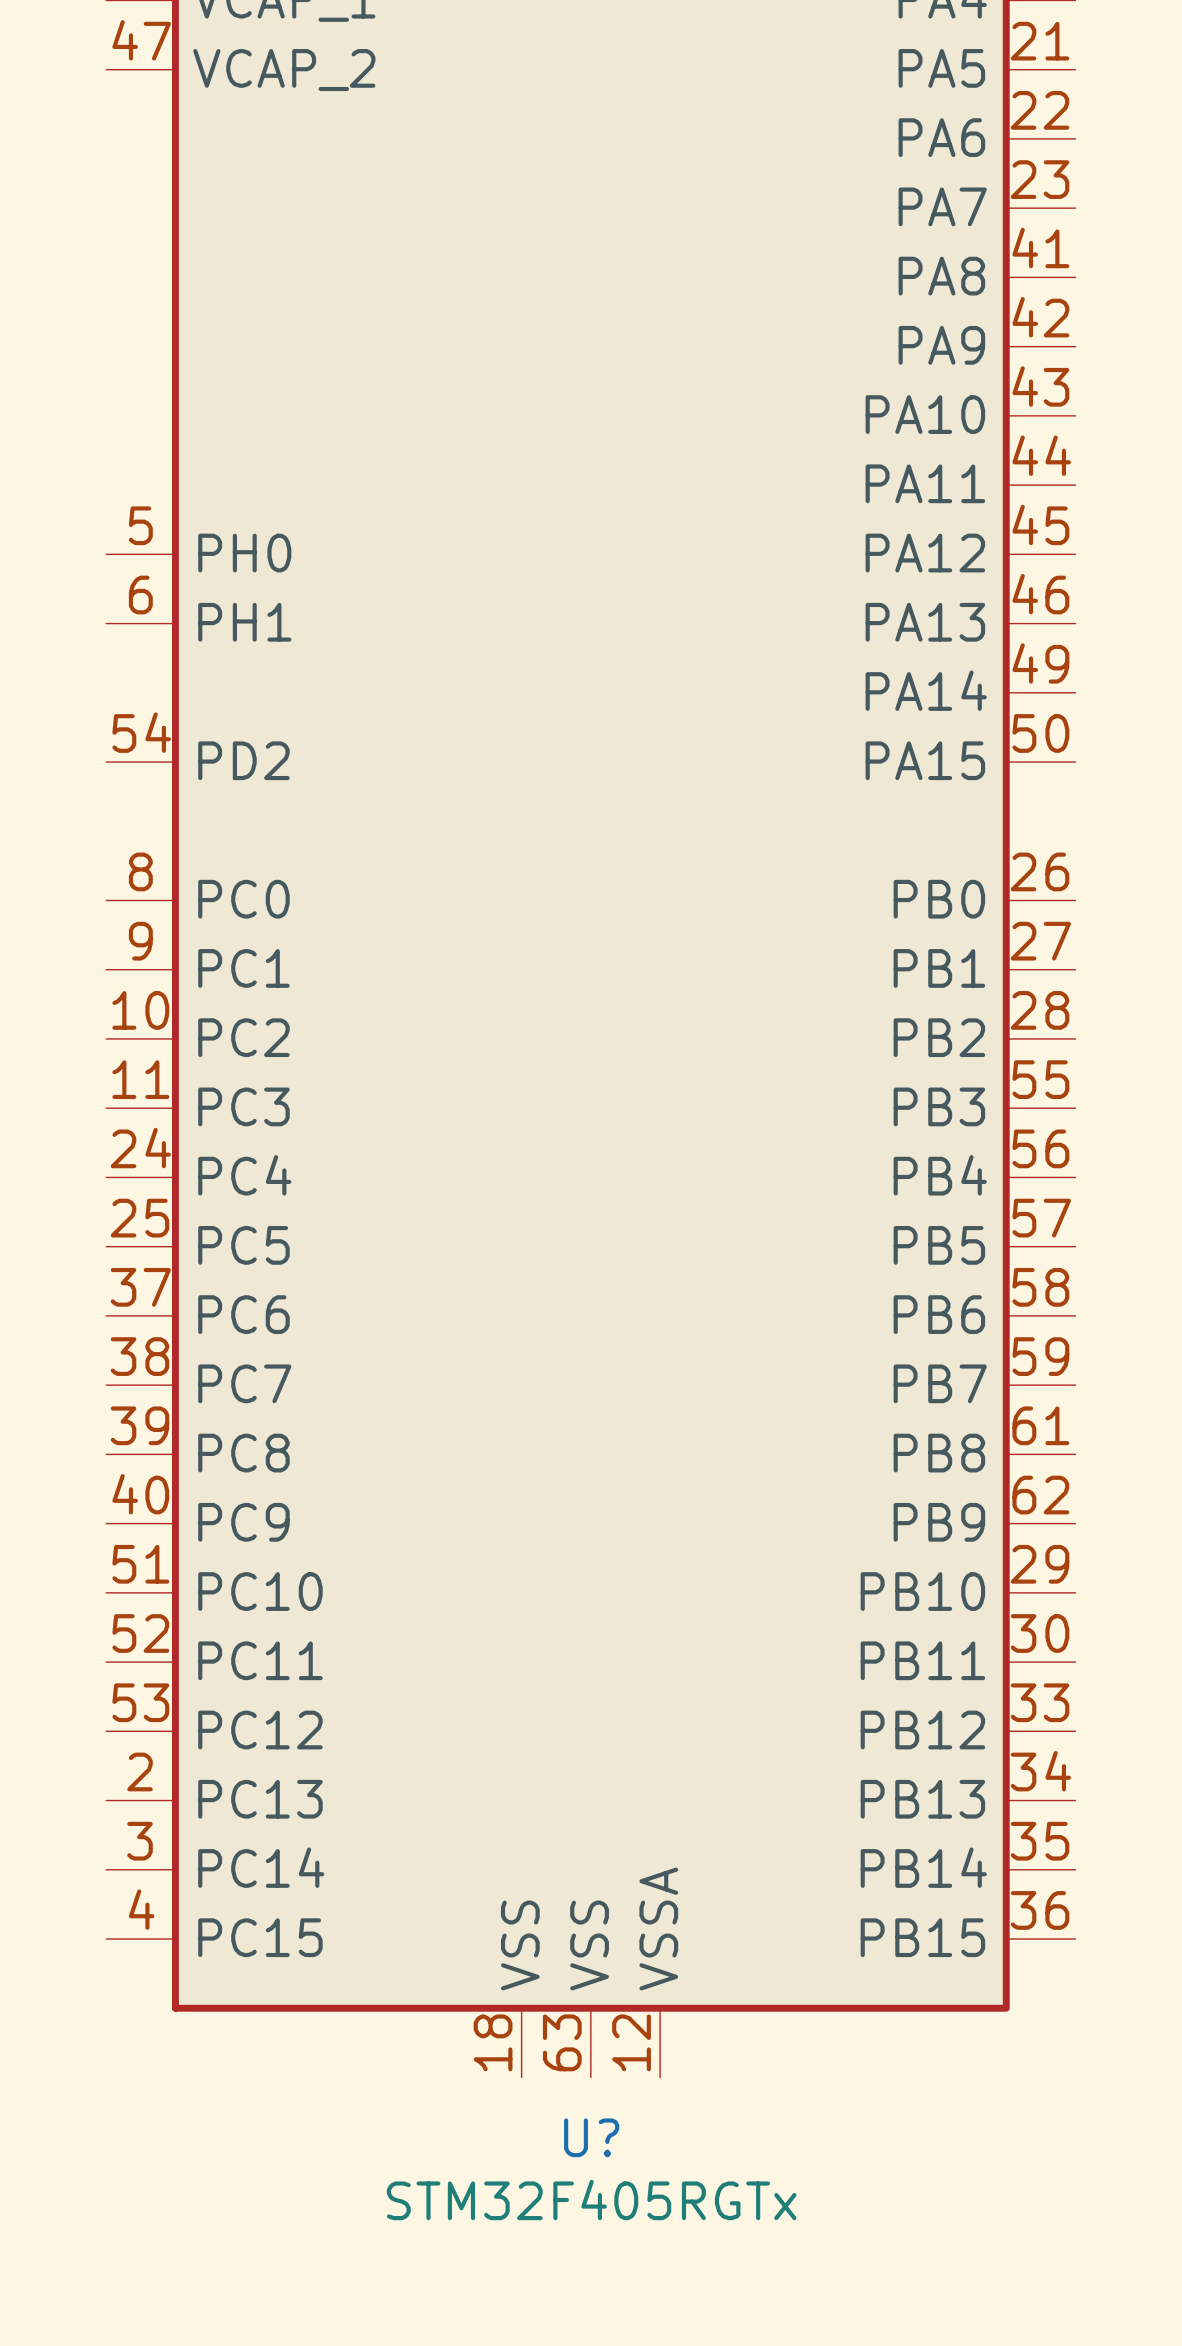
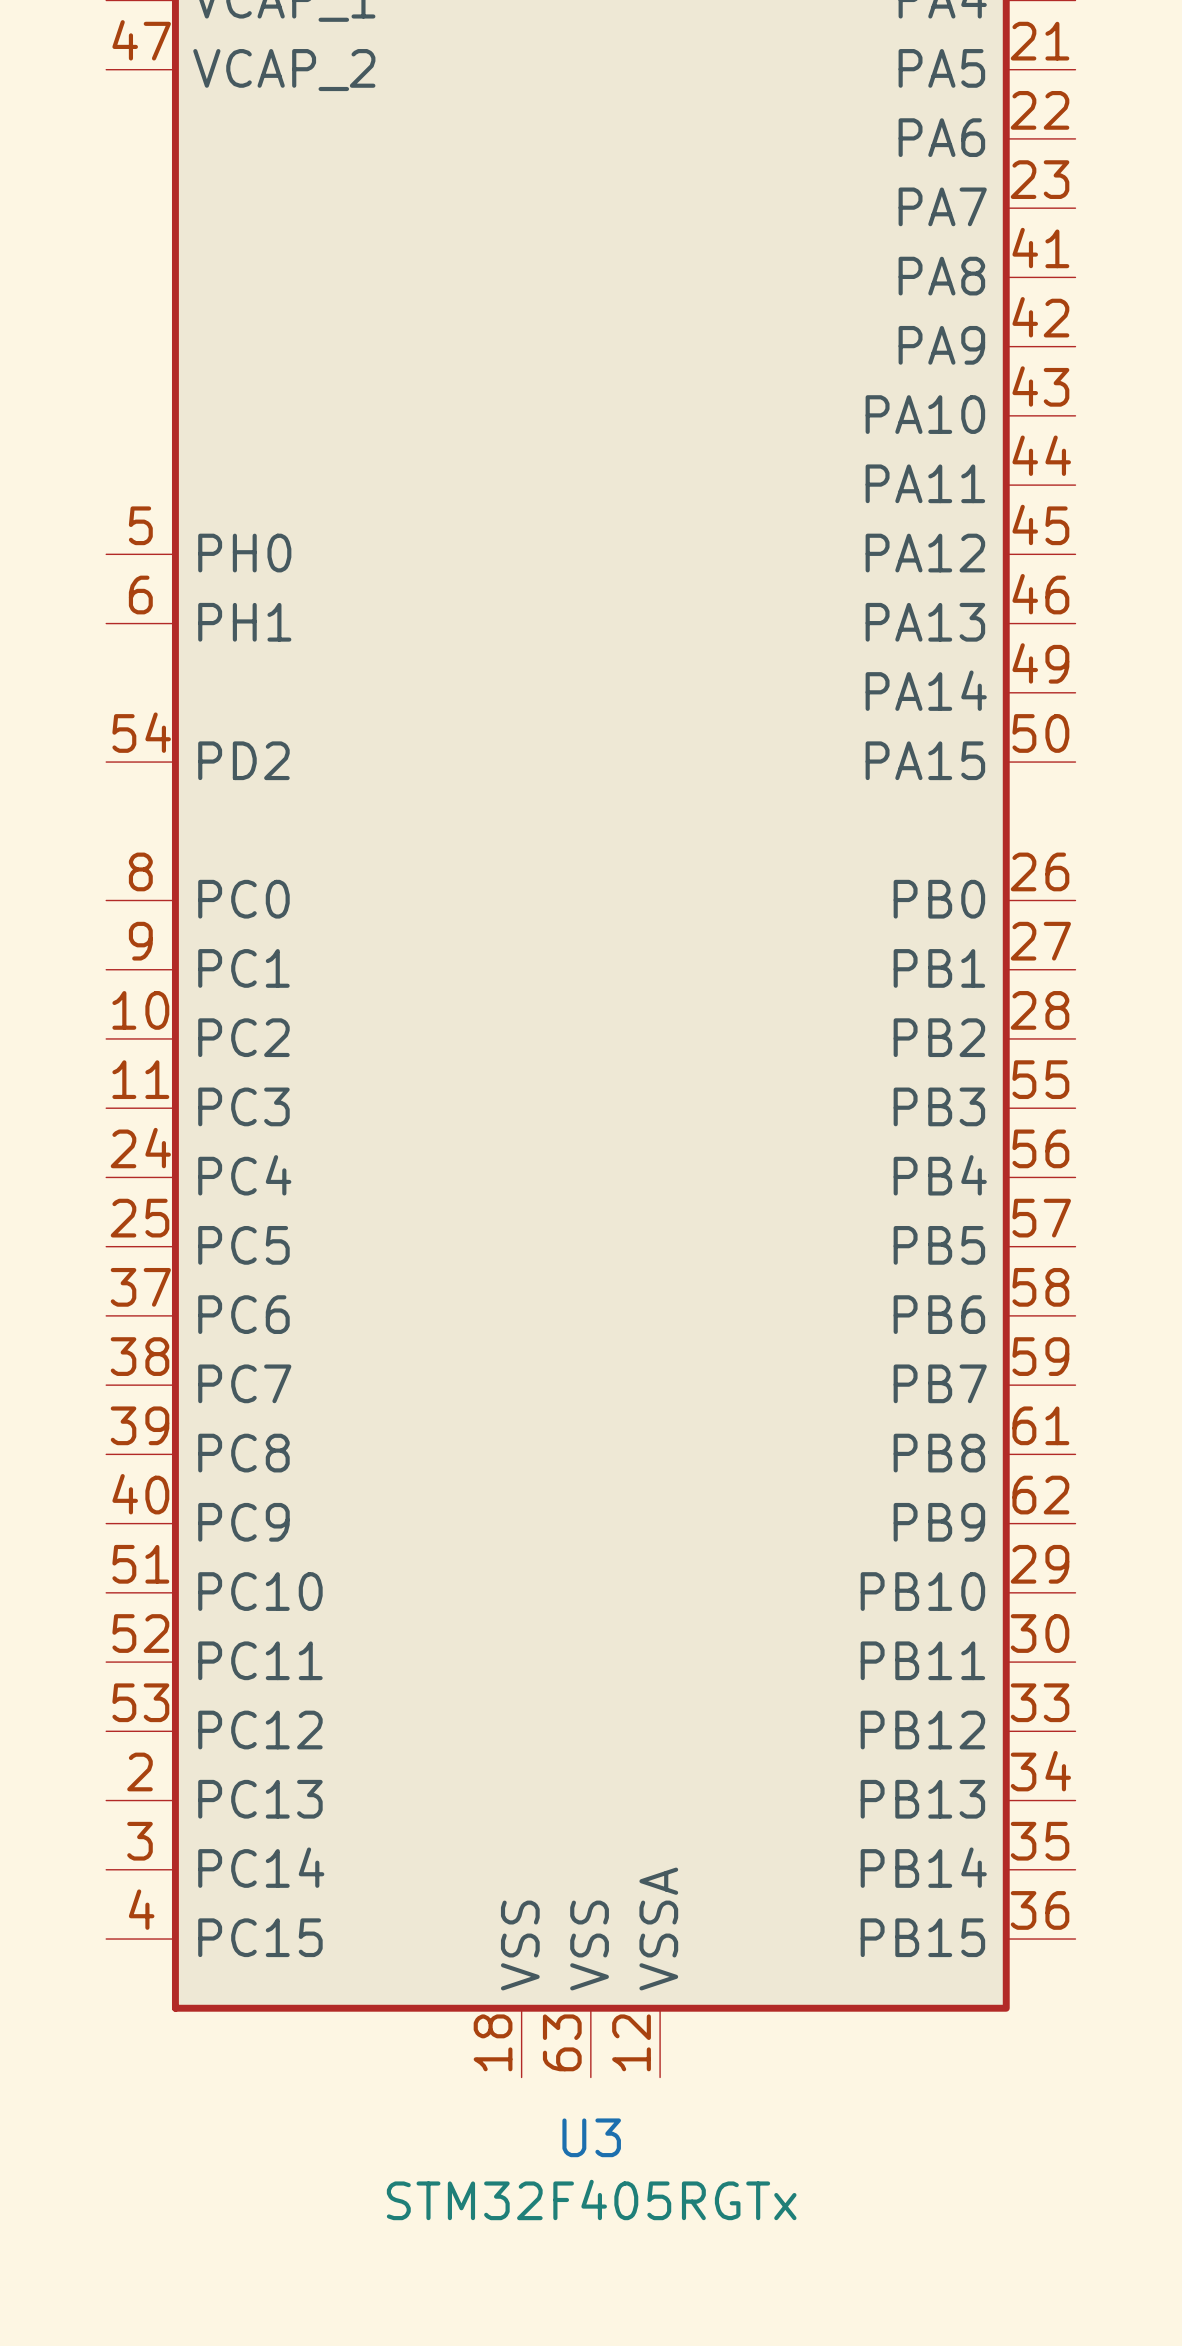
U? name: U? (591, 2137) -> U3 (591, 2137)

